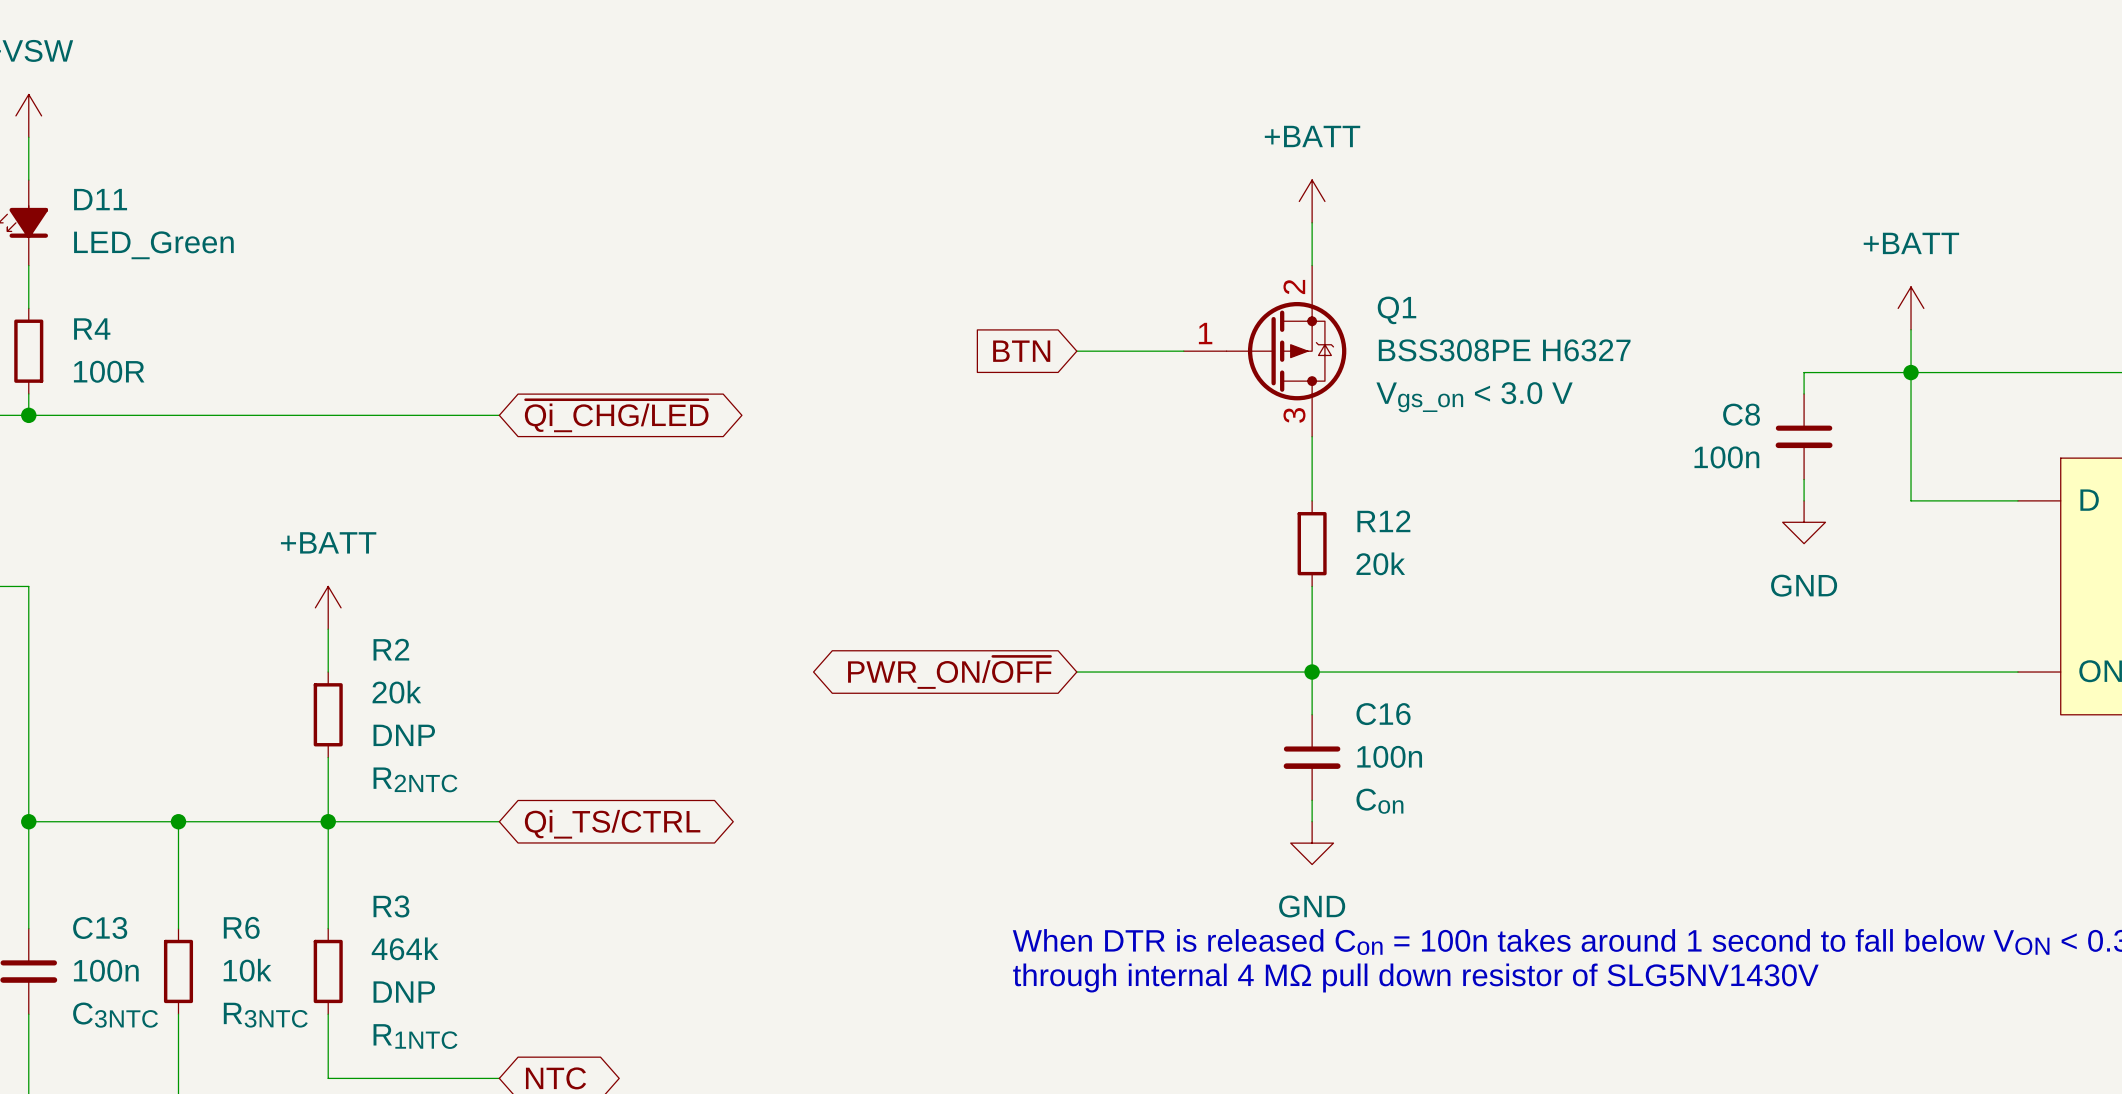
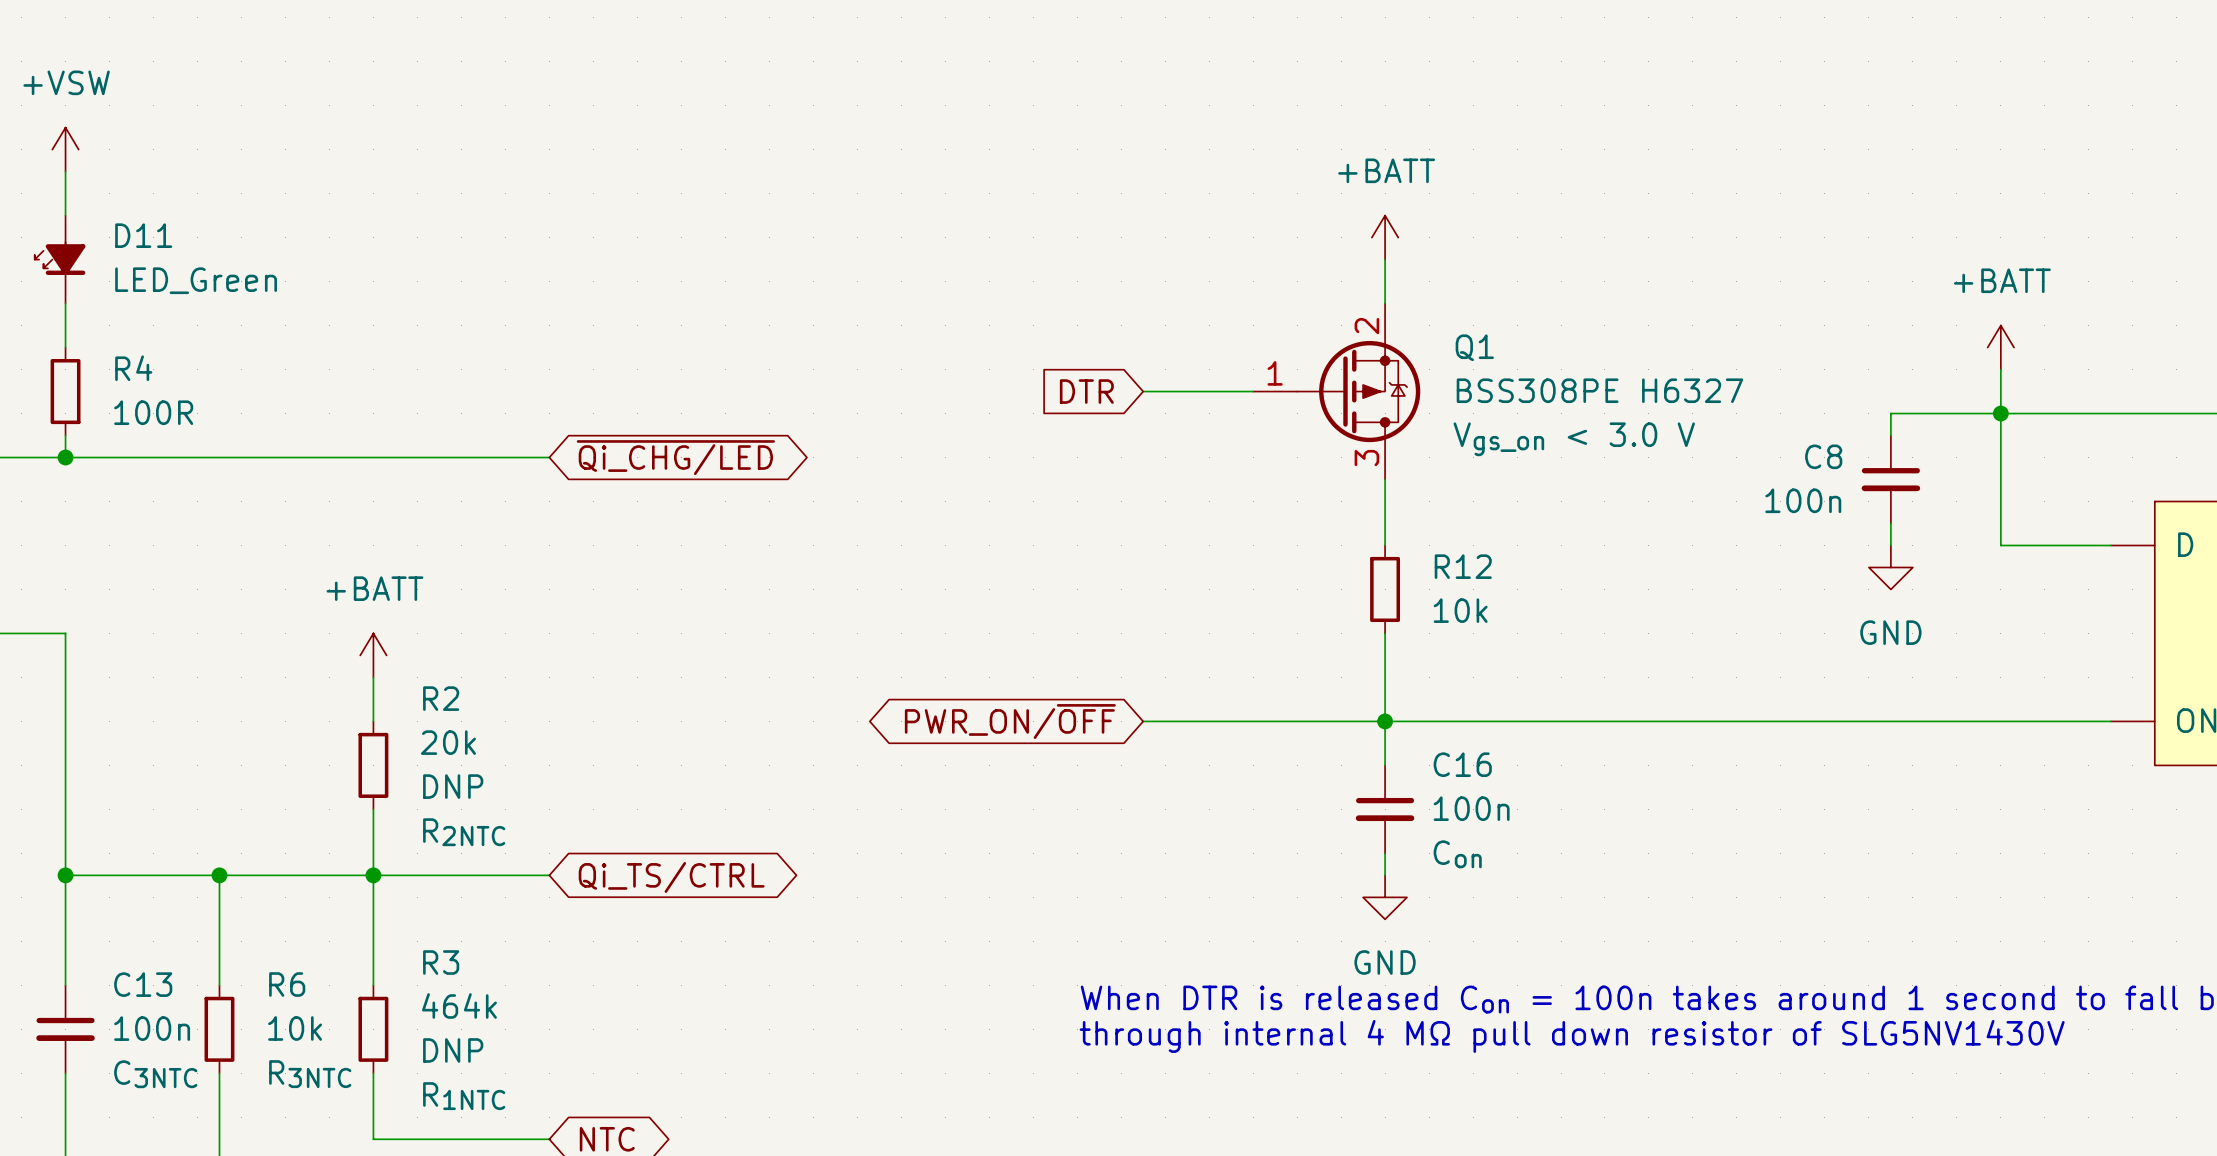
global label: BTN (1021, 351) -> DTR (1086, 391)
R12 value: 20k (1380, 563) -> 10k (1460, 610)

